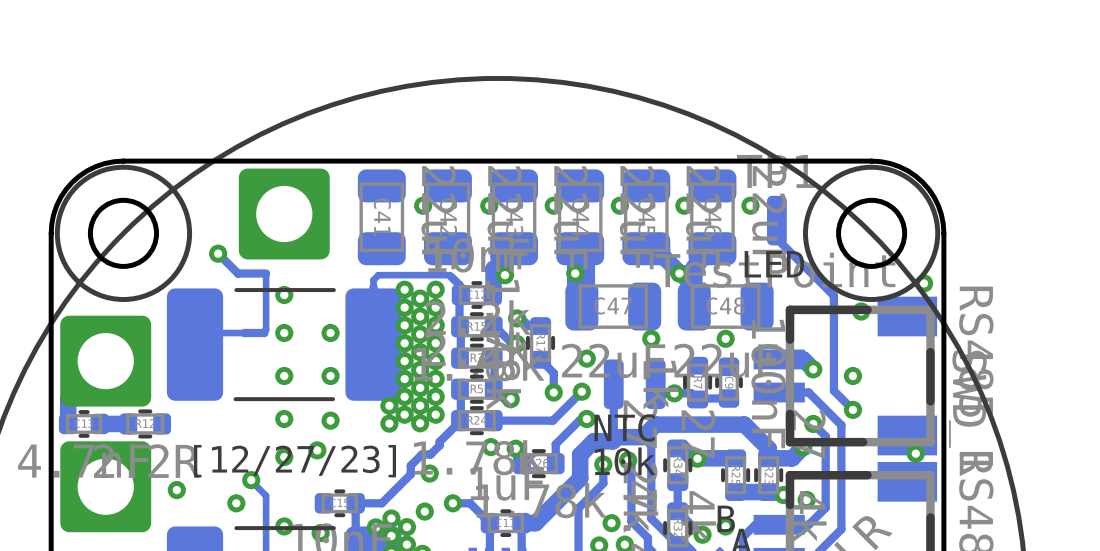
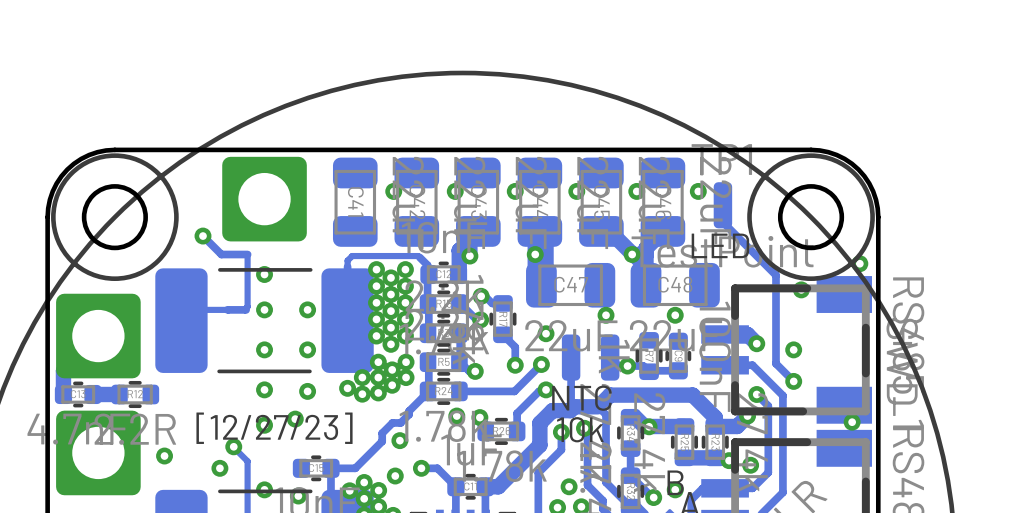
via: (404, 378) -> none
via: (435, 378) -> none
via: (420, 387) -> none
via: none -> (378, 362)
via: none -> (406, 362)
via: (404, 396) -> none
via: (435, 396) -> none
via: none -> (392, 369)
via: none -> (378, 377)
via: (420, 405) -> none
via: none -> (406, 377)
via: (404, 414) -> none
via: none -> (392, 385)
via: (435, 414) -> none
via: none -> (347, 388)
via: none -> (378, 392)
via: (420, 423) -> none

